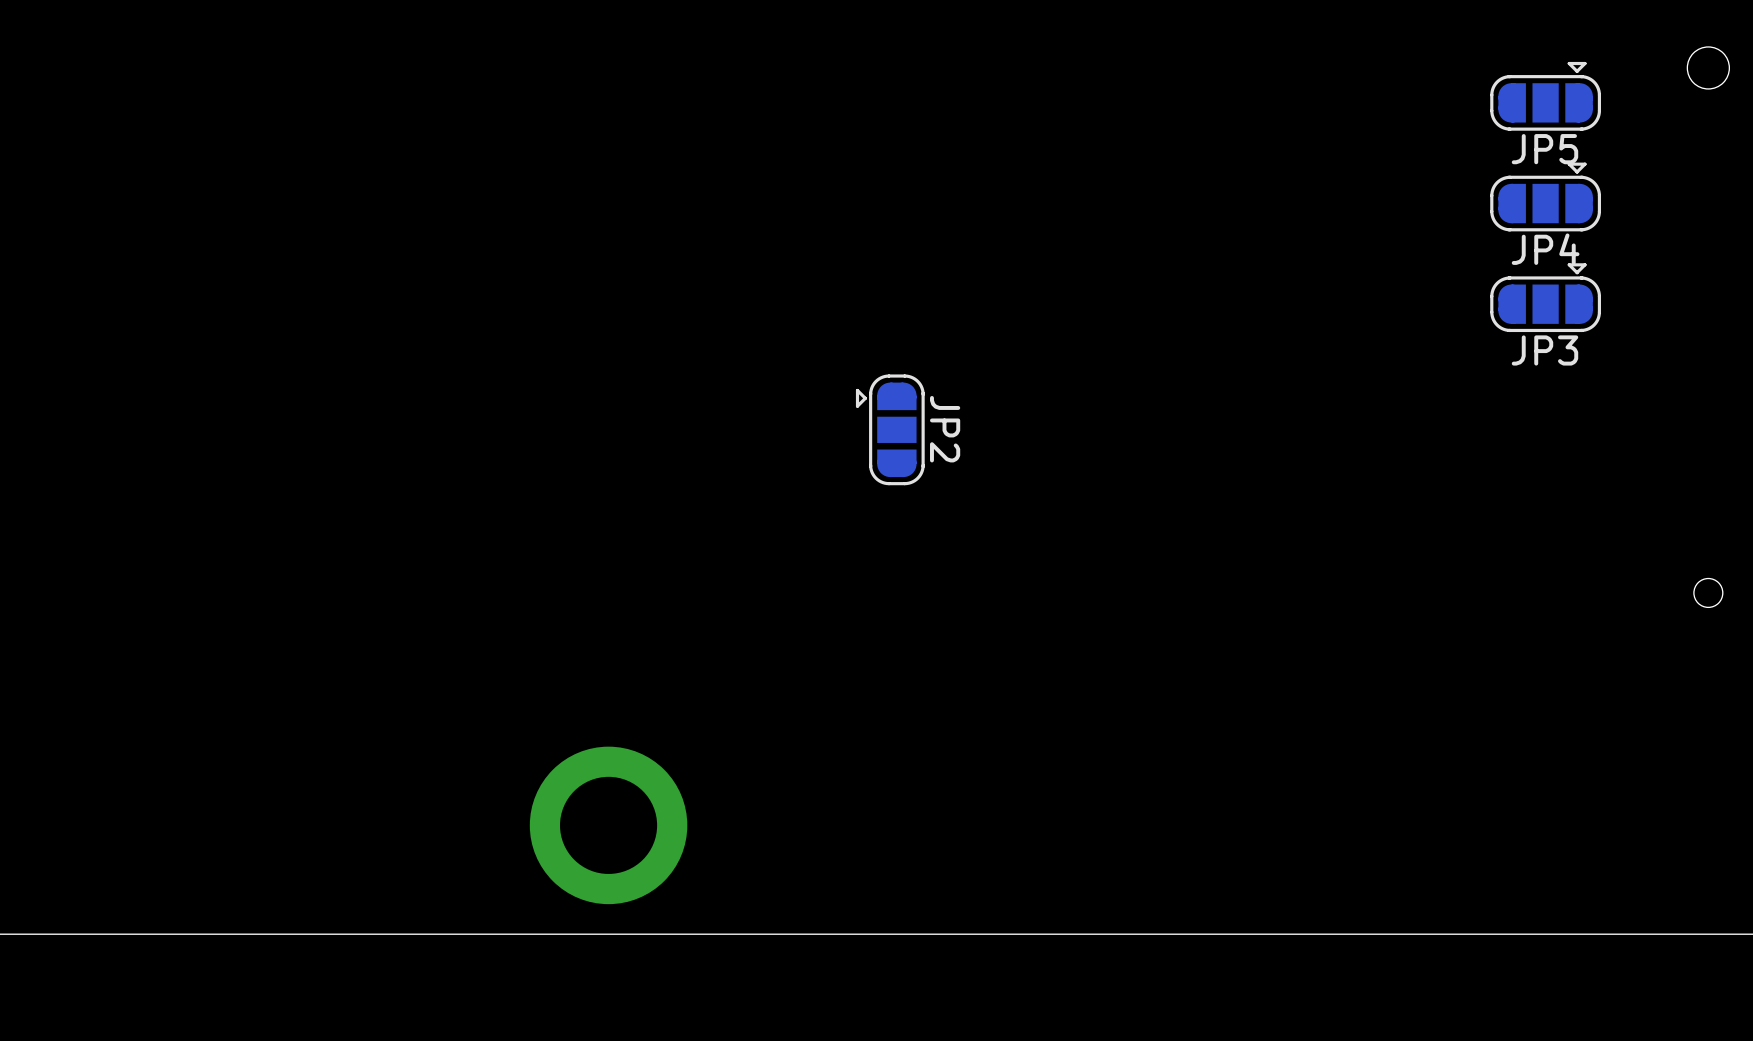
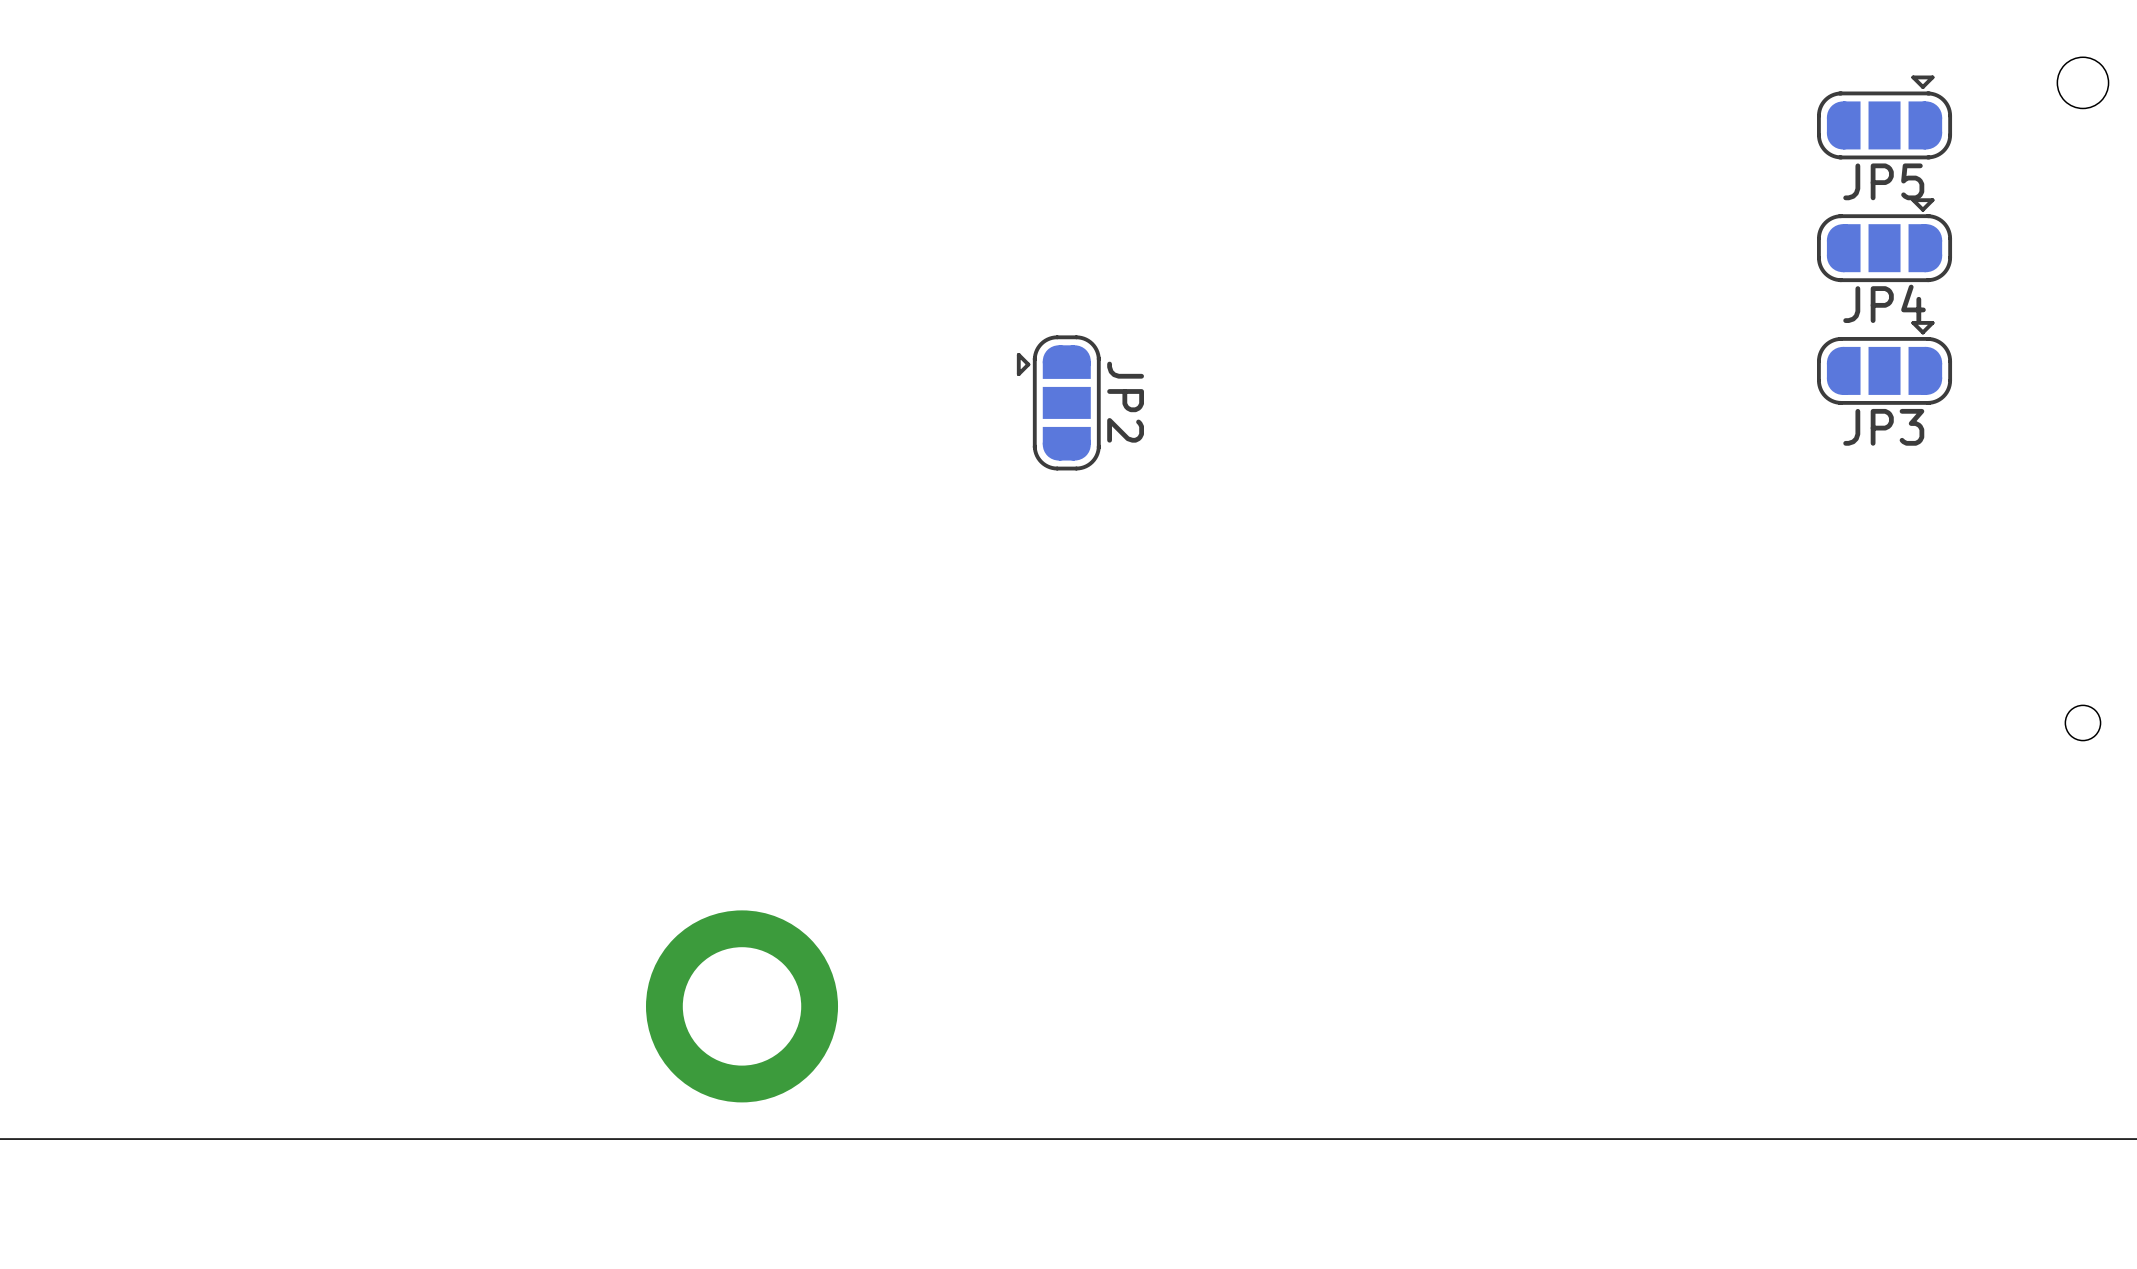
JP2 position: (890, 429) -> (1058, 402)

